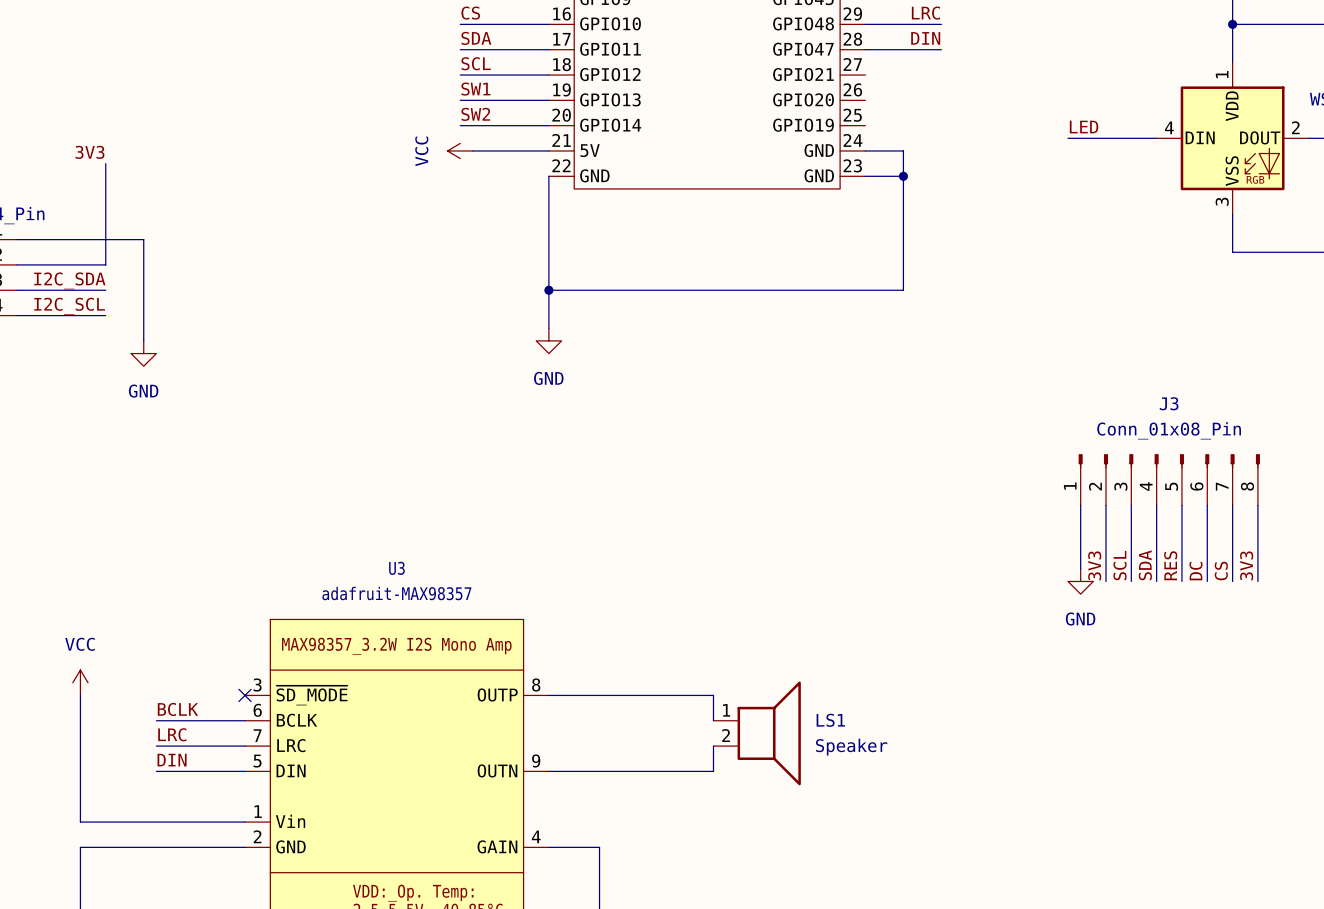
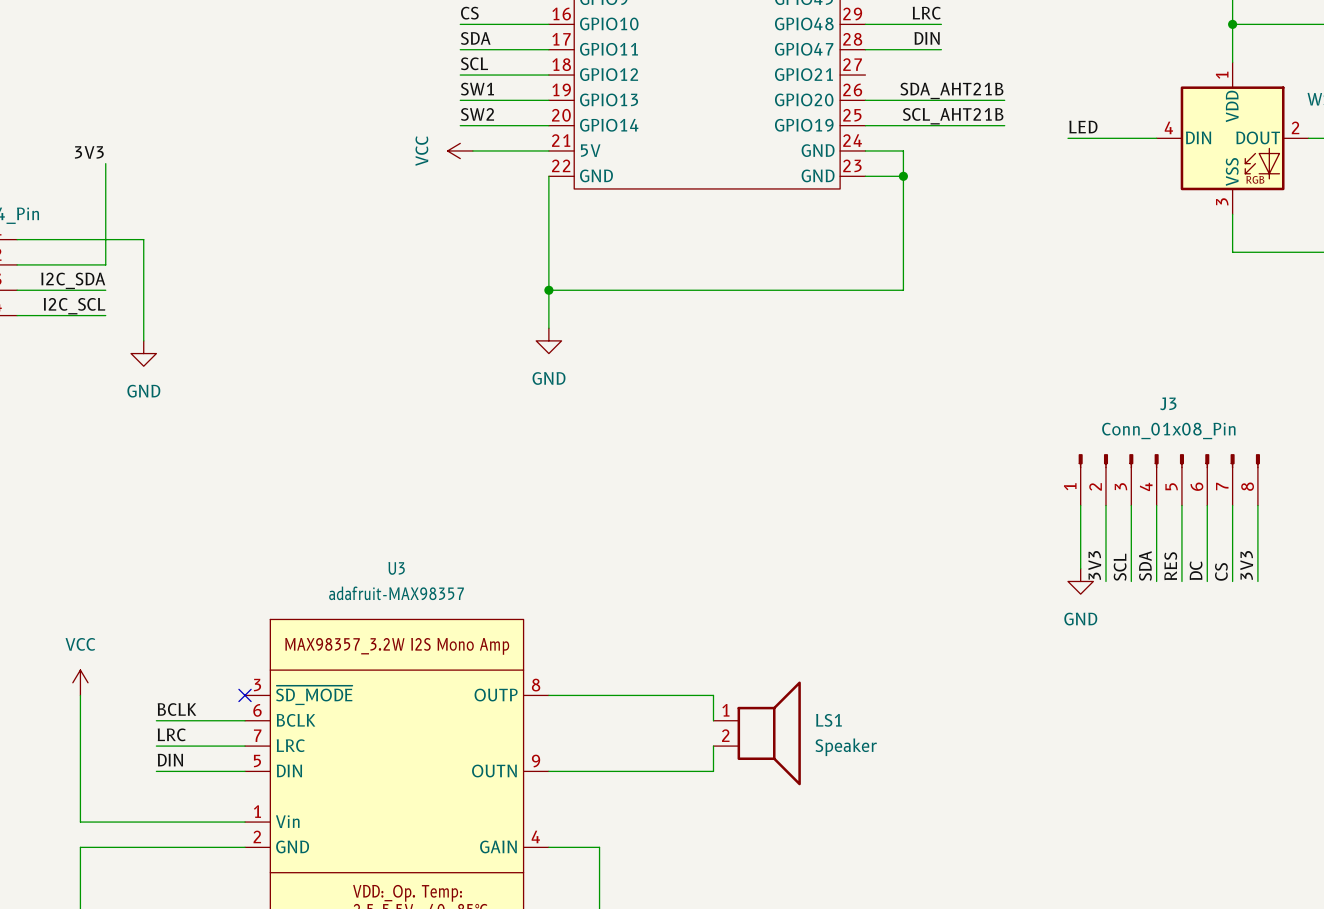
label: none -> SDA_AHT21B (951, 90)
wire: none -> (865, 100) (1004, 100)
label: none -> SCL_AHT21B (953, 116)
wire: none -> (865, 125) (1004, 125)

